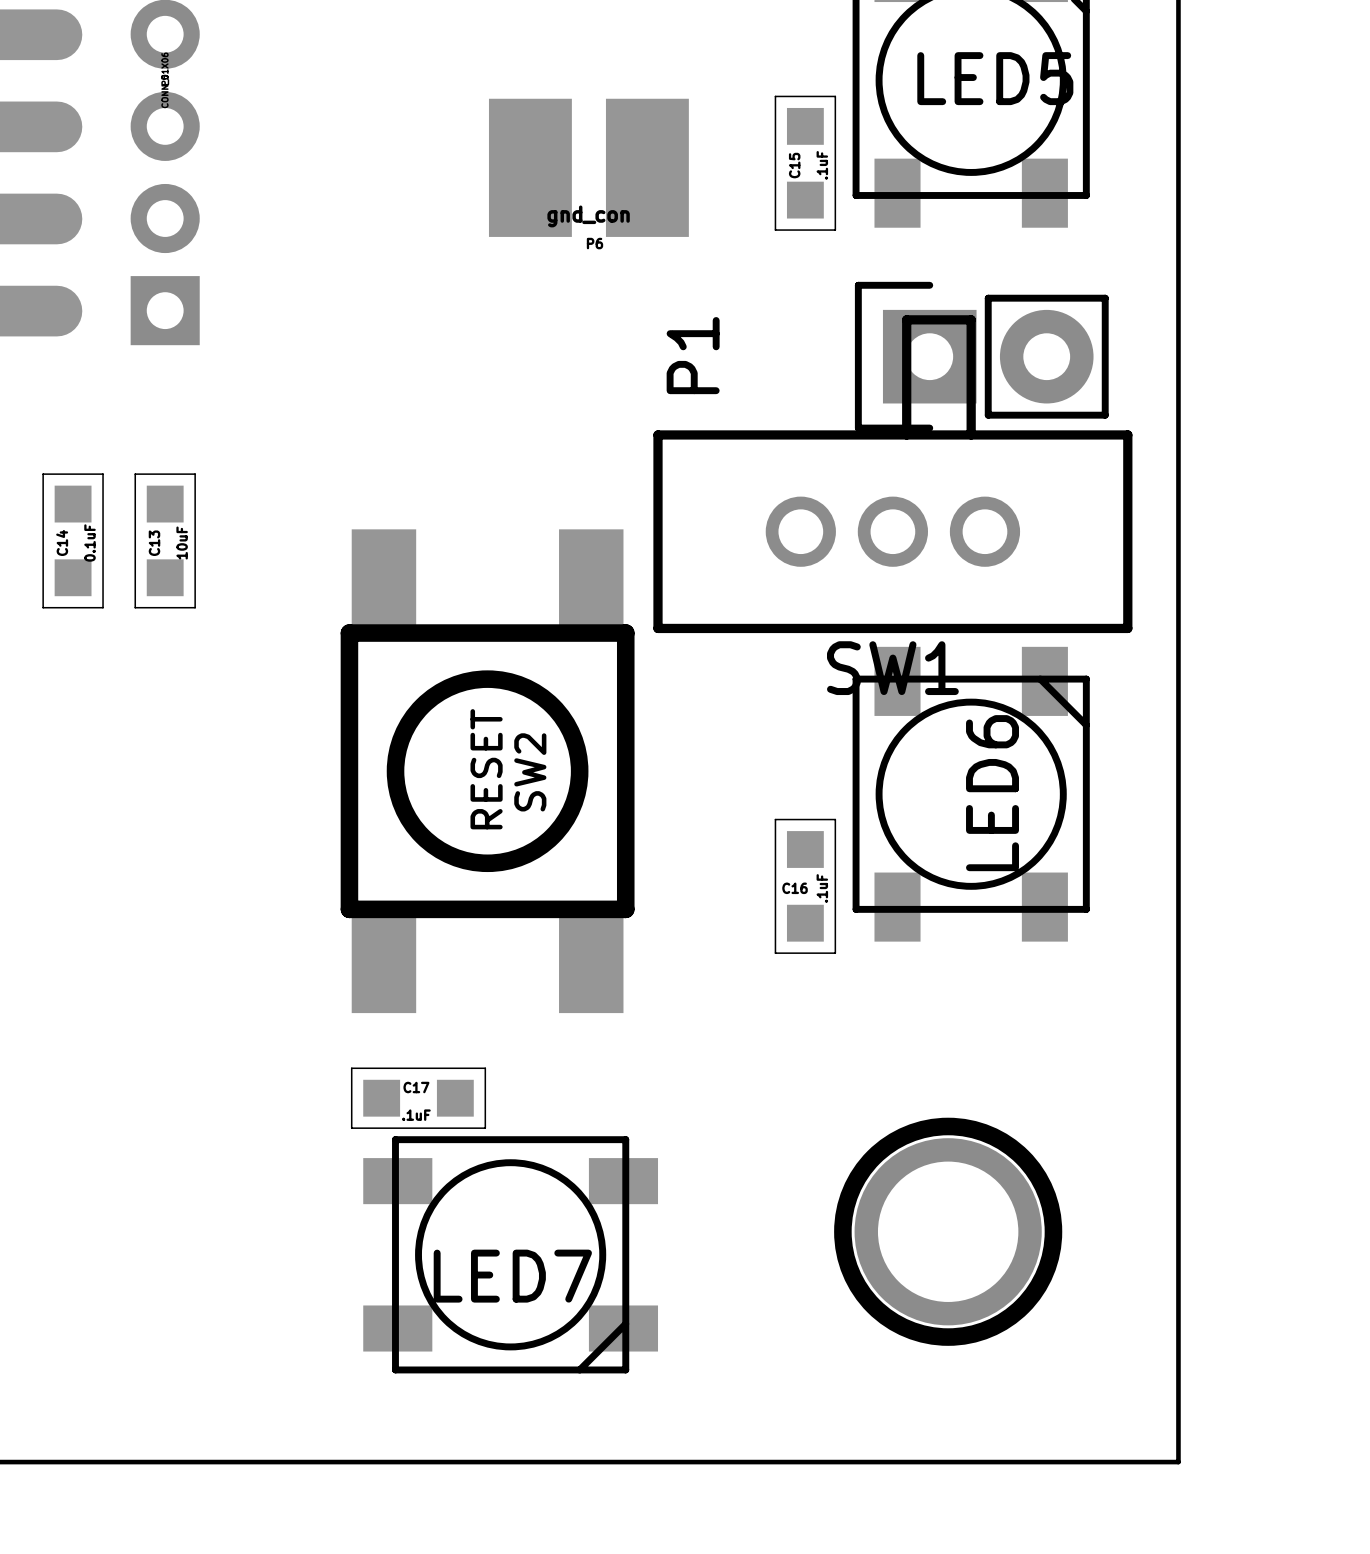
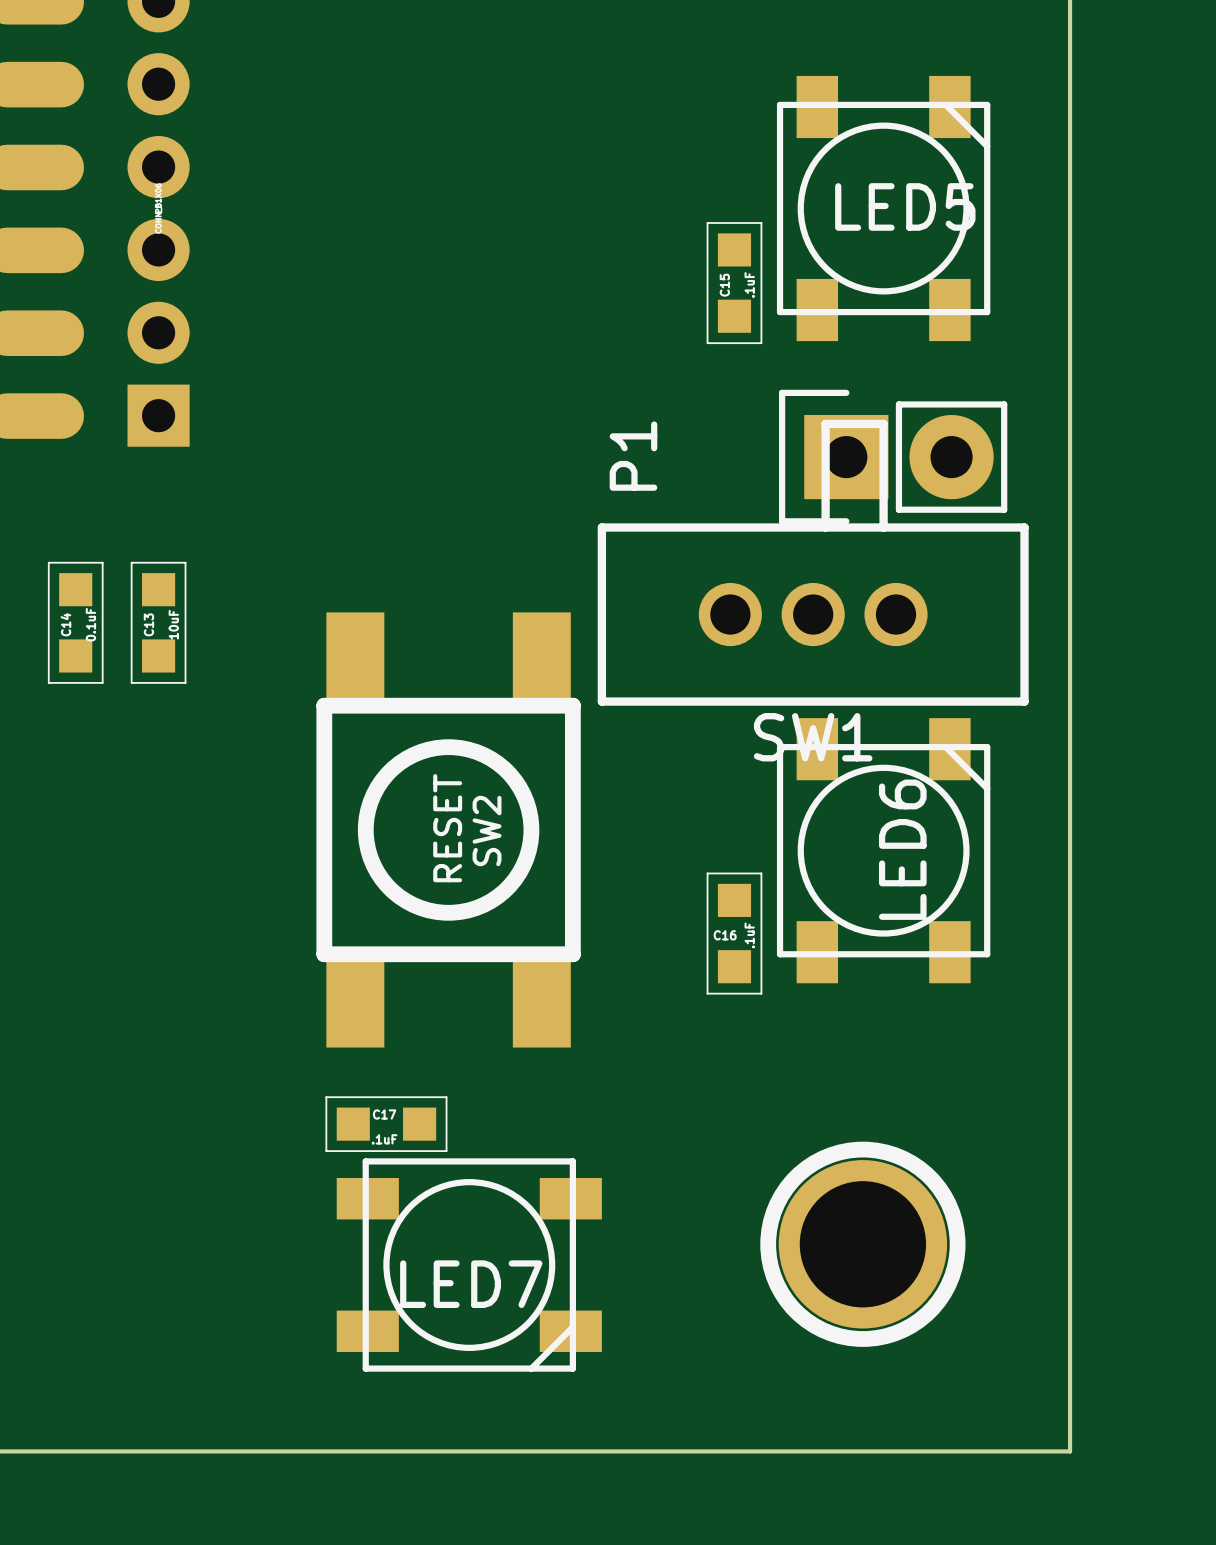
P6: gnd_con (588, 167) -> none

